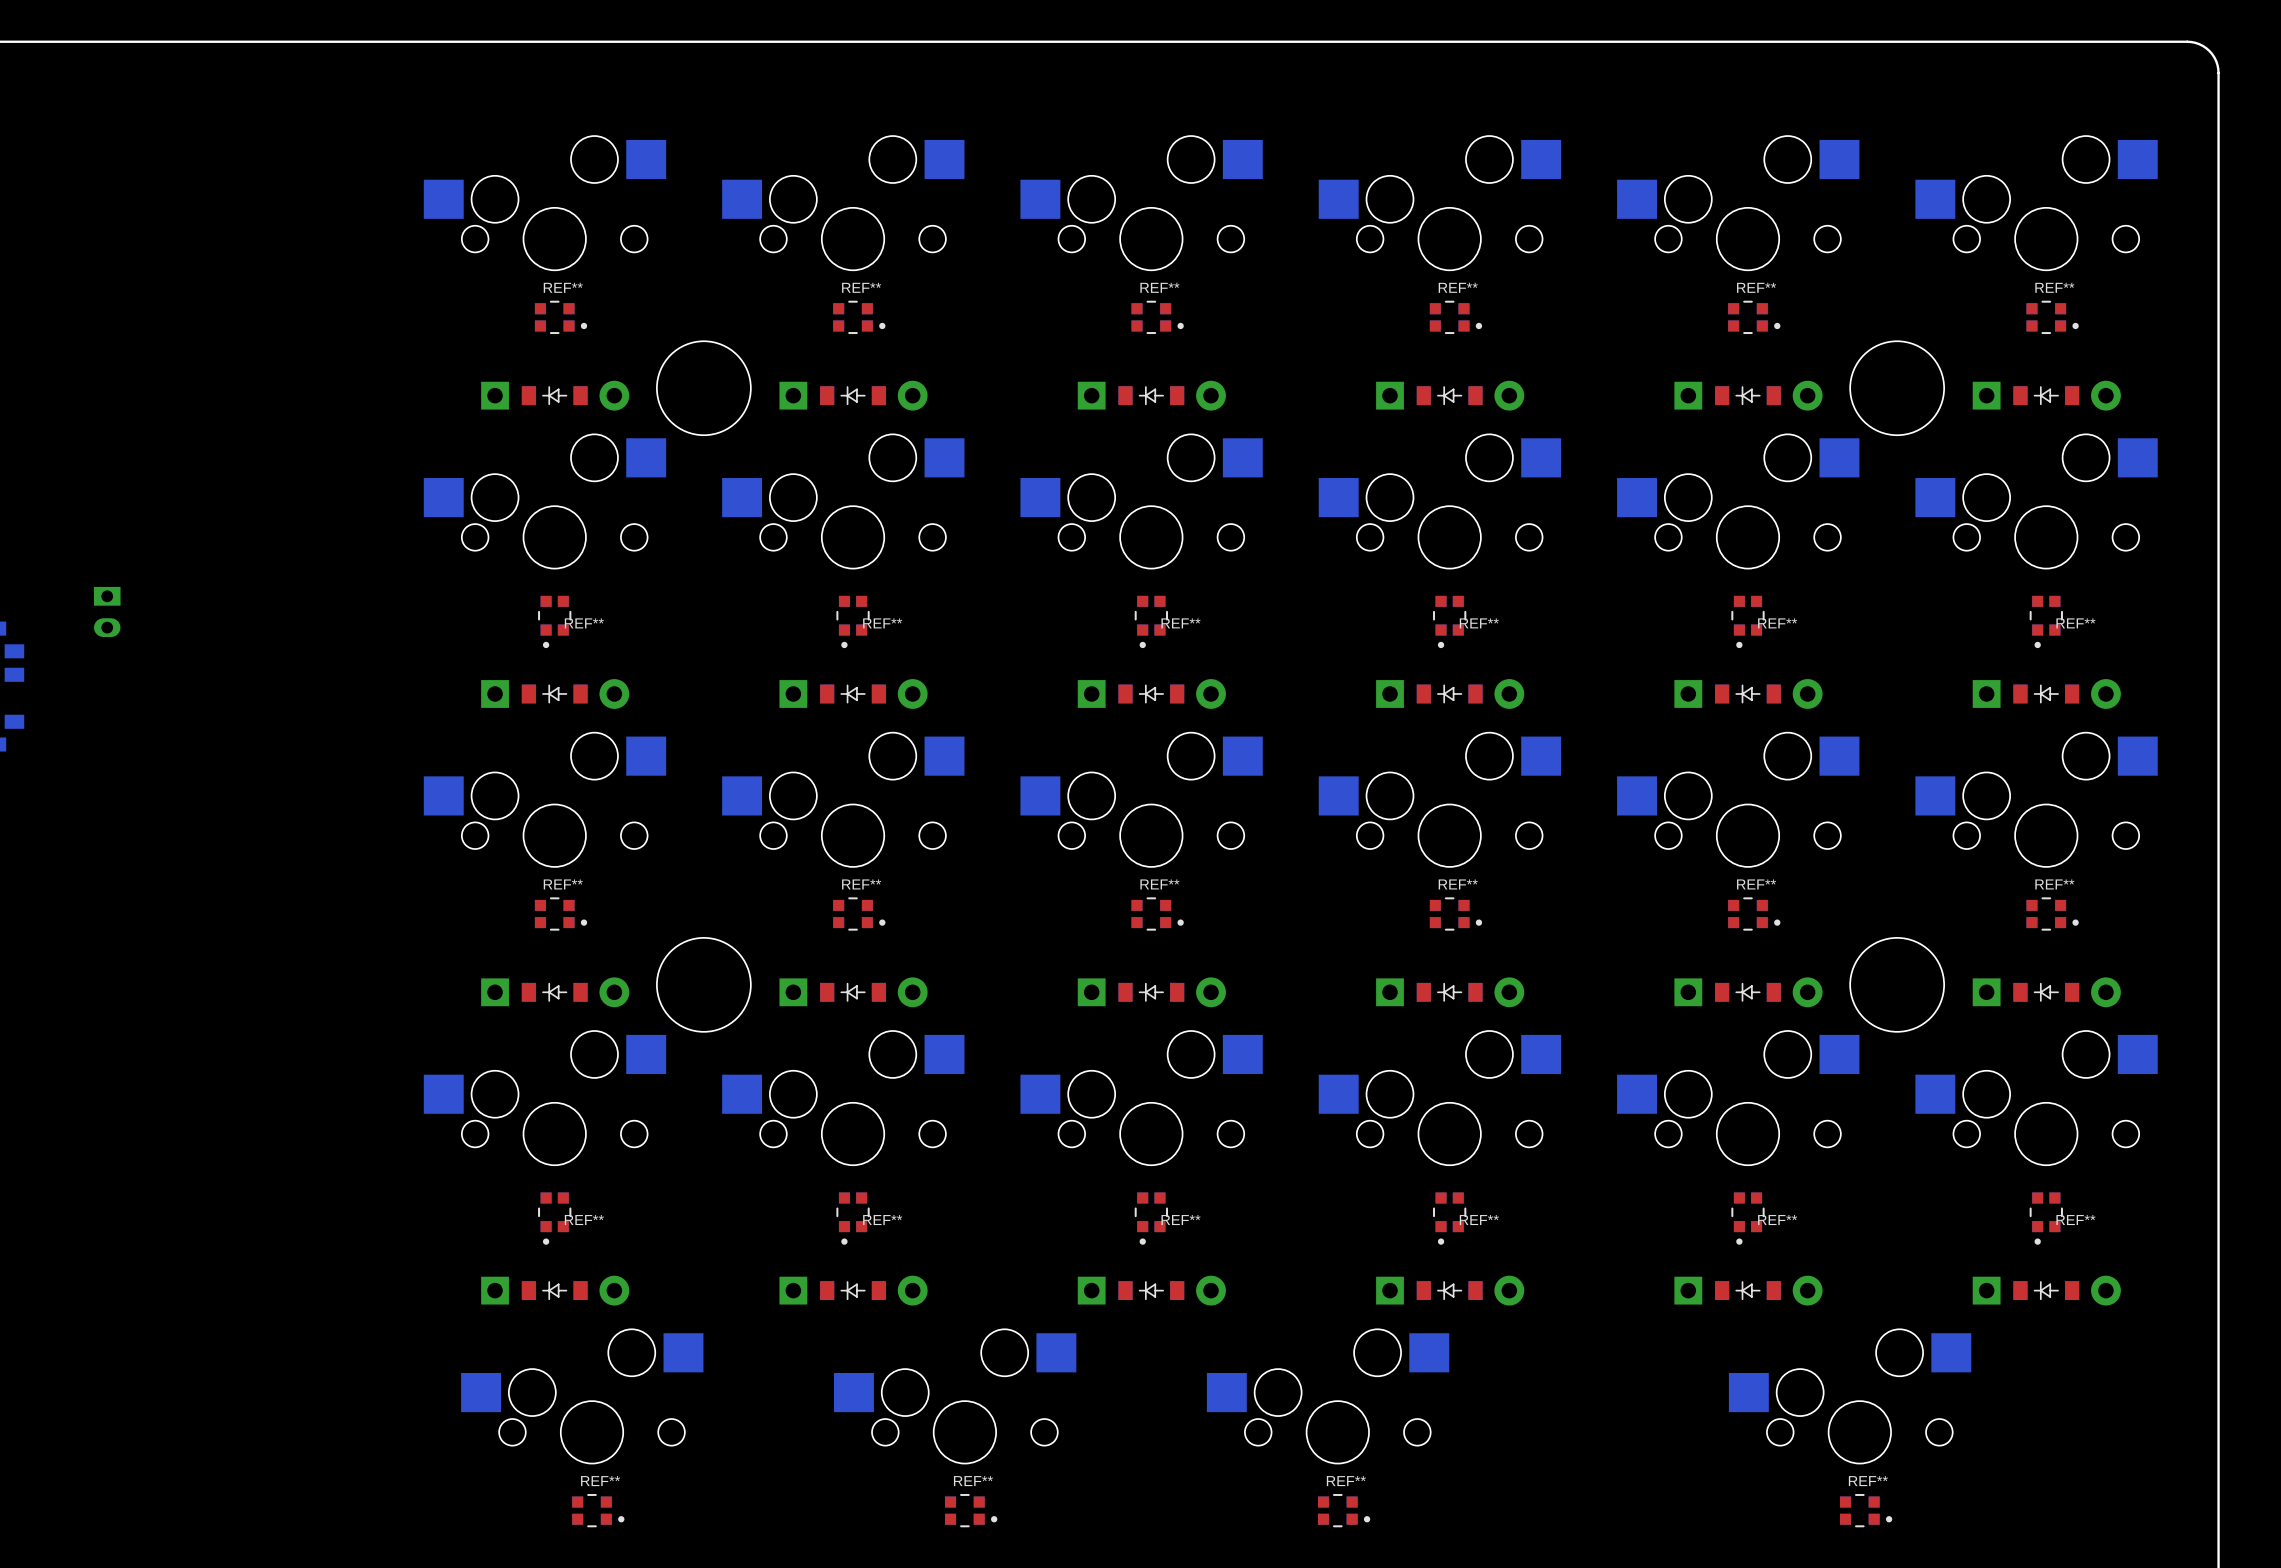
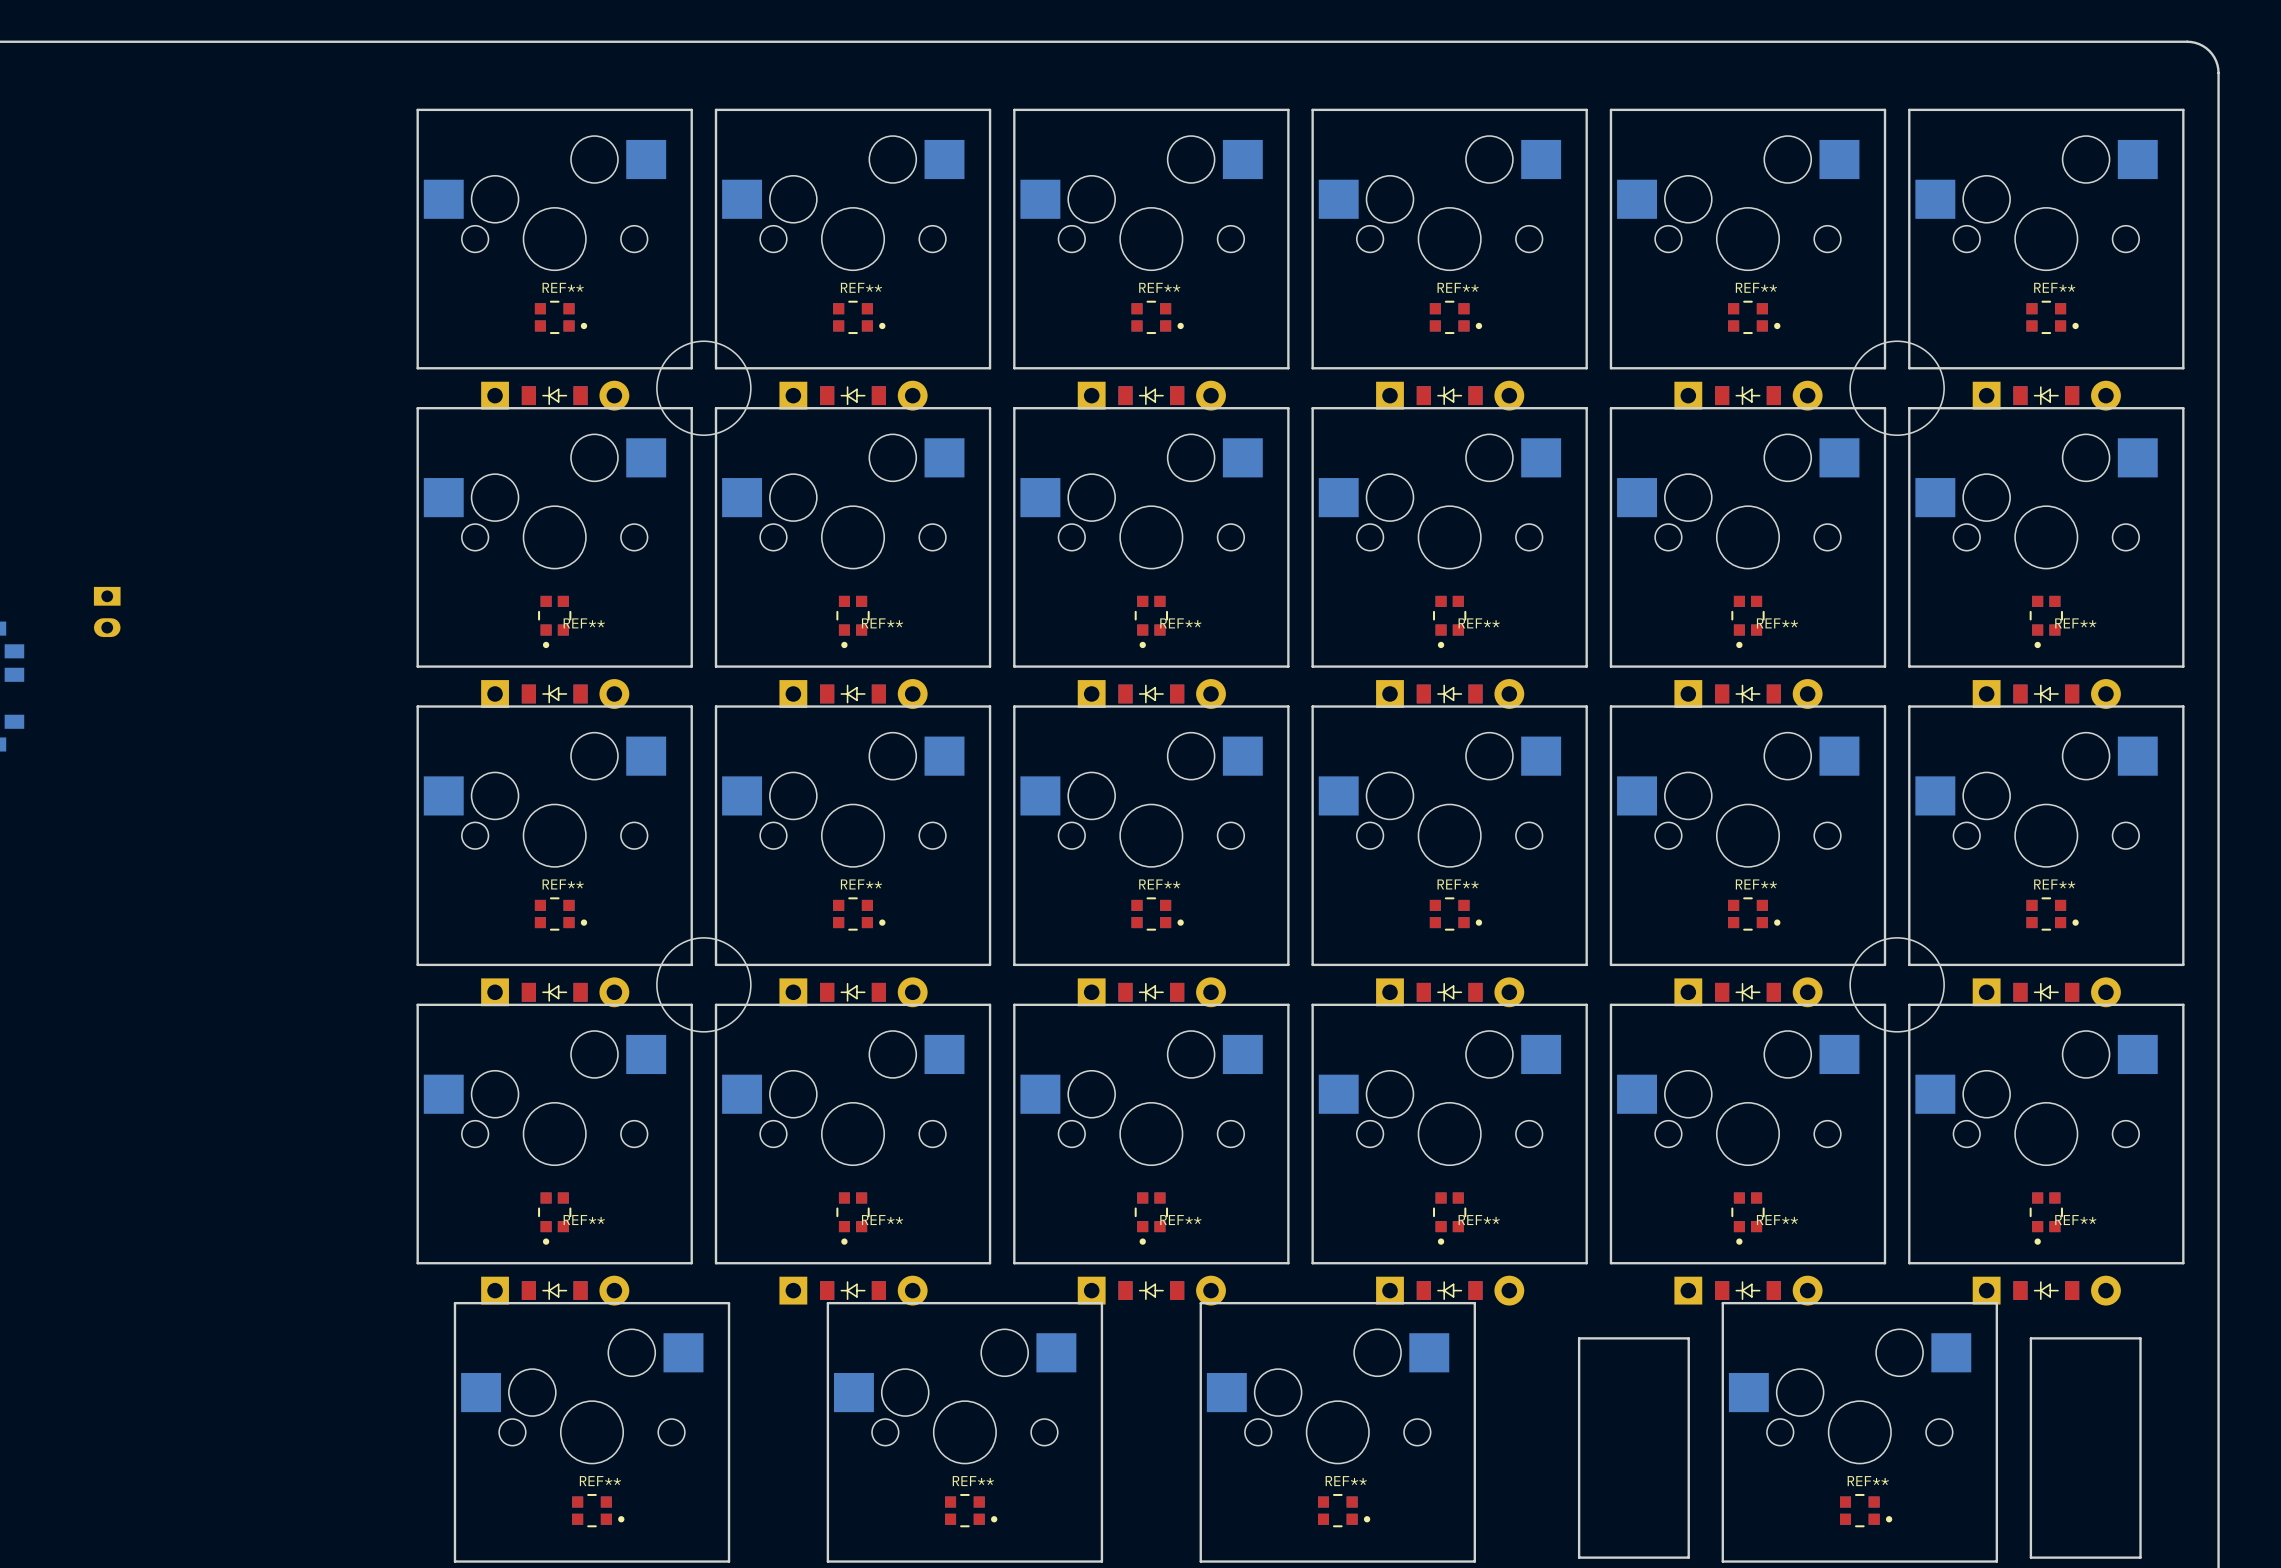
board edge: none -> (417, 109) (417, 368) (691, 368) (691, 109) (417, 109)
board edge: none -> (716, 109) (990, 109) (990, 368) (716, 368) (716, 109)
board edge: none -> (1014, 109) (1288, 109) (1288, 368) (1014, 368) (1014, 109)
board edge: none -> (1312, 109) (1586, 109) (1586, 368) (1312, 368) (1312, 109)
board edge: none -> (1610, 109) (1885, 109) (1885, 368) (1610, 368) (1610, 109)
board edge: none -> (1909, 109) (2183, 109) (2183, 368) (1909, 368) (1909, 109)
board edge: none -> (417, 408) (417, 666) (691, 666) (691, 408) (417, 408)
board edge: none -> (716, 408) (990, 408) (990, 666) (716, 666) (716, 408)
board edge: none -> (1014, 408) (1288, 408) (1288, 666) (1014, 666) (1014, 408)
board edge: none -> (1312, 408) (1586, 408) (1586, 666) (1312, 666) (1312, 408)
board edge: none -> (1610, 408) (1885, 408) (1885, 666) (1610, 666) (1610, 408)
board edge: none -> (1909, 408) (2183, 408) (2183, 666) (1909, 666) (1909, 408)
board edge: none -> (417, 706) (417, 964) (691, 964) (691, 706) (417, 706)
board edge: none -> (716, 706) (990, 706) (990, 964) (716, 964) (716, 706)
board edge: none -> (1014, 706) (1288, 706) (1288, 964) (1014, 964) (1014, 706)
board edge: none -> (1312, 706) (1586, 706) (1586, 964) (1312, 964) (1312, 706)
board edge: none -> (1610, 706) (1885, 706) (1885, 964) (1610, 964) (1610, 706)
board edge: none -> (1909, 706) (2183, 706) (2183, 964) (1909, 964) (1909, 706)
board edge: none -> (417, 1004) (691, 1004) (691, 1263) (417, 1263) (417, 1004)
board edge: none -> (716, 1004) (990, 1004) (990, 1263) (716, 1263) (716, 1004)
board edge: none -> (1014, 1004) (1288, 1004) (1288, 1263) (1014, 1263) (1014, 1004)
board edge: none -> (1312, 1004) (1586, 1004) (1586, 1263) (1312, 1263) (1312, 1004)
board edge: none -> (1610, 1004) (1885, 1004) (1885, 1263) (1610, 1263) (1610, 1004)
board edge: none -> (1909, 1004) (2183, 1004) (2183, 1263) (1909, 1263) (1909, 1004)
board edge: none -> (454, 1303) (729, 1303) (729, 1561) (454, 1561) (454, 1303)
board edge: none -> (827, 1303) (1101, 1303) (1101, 1561) (827, 1561) (827, 1303)
board edge: none -> (1200, 1303) (1474, 1303) (1474, 1561) (1200, 1561) (1200, 1303)
board edge: none -> (1722, 1303) (1996, 1303) (1996, 1561) (1722, 1561) (1722, 1303)
board edge: none -> (1579, 1338) (1688, 1338) (1688, 1557) (1579, 1557) (1579, 1338)
board edge: none -> (2030, 1338) (2140, 1338) (2140, 1557) (2030, 1557) (2030, 1338)

